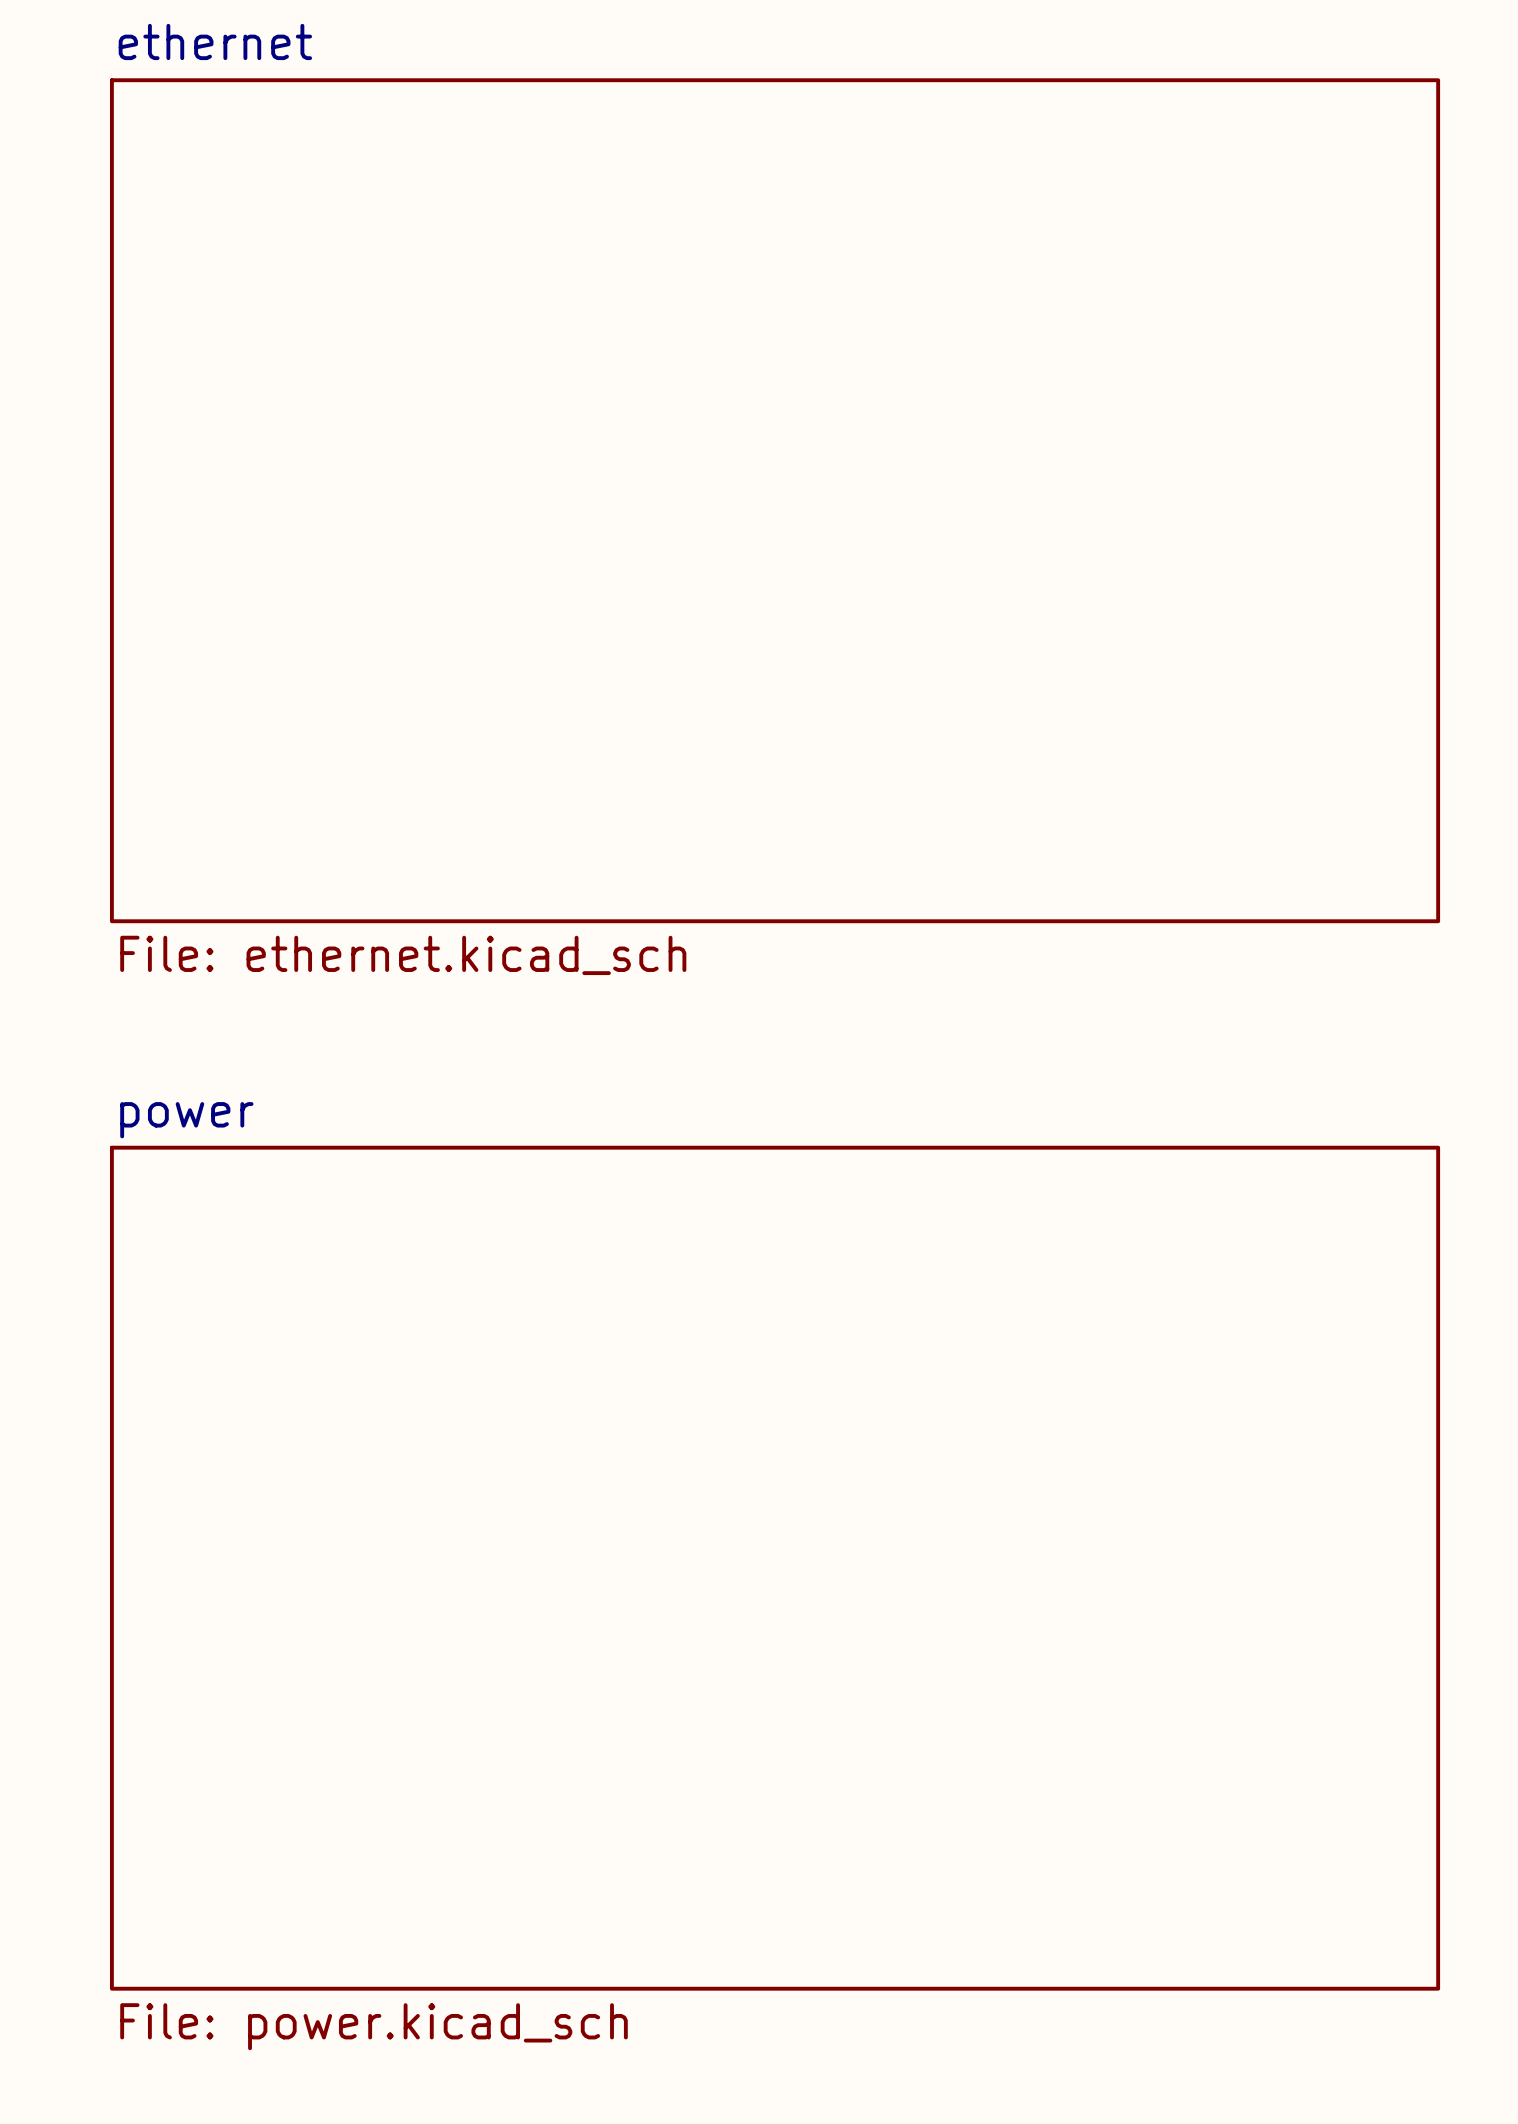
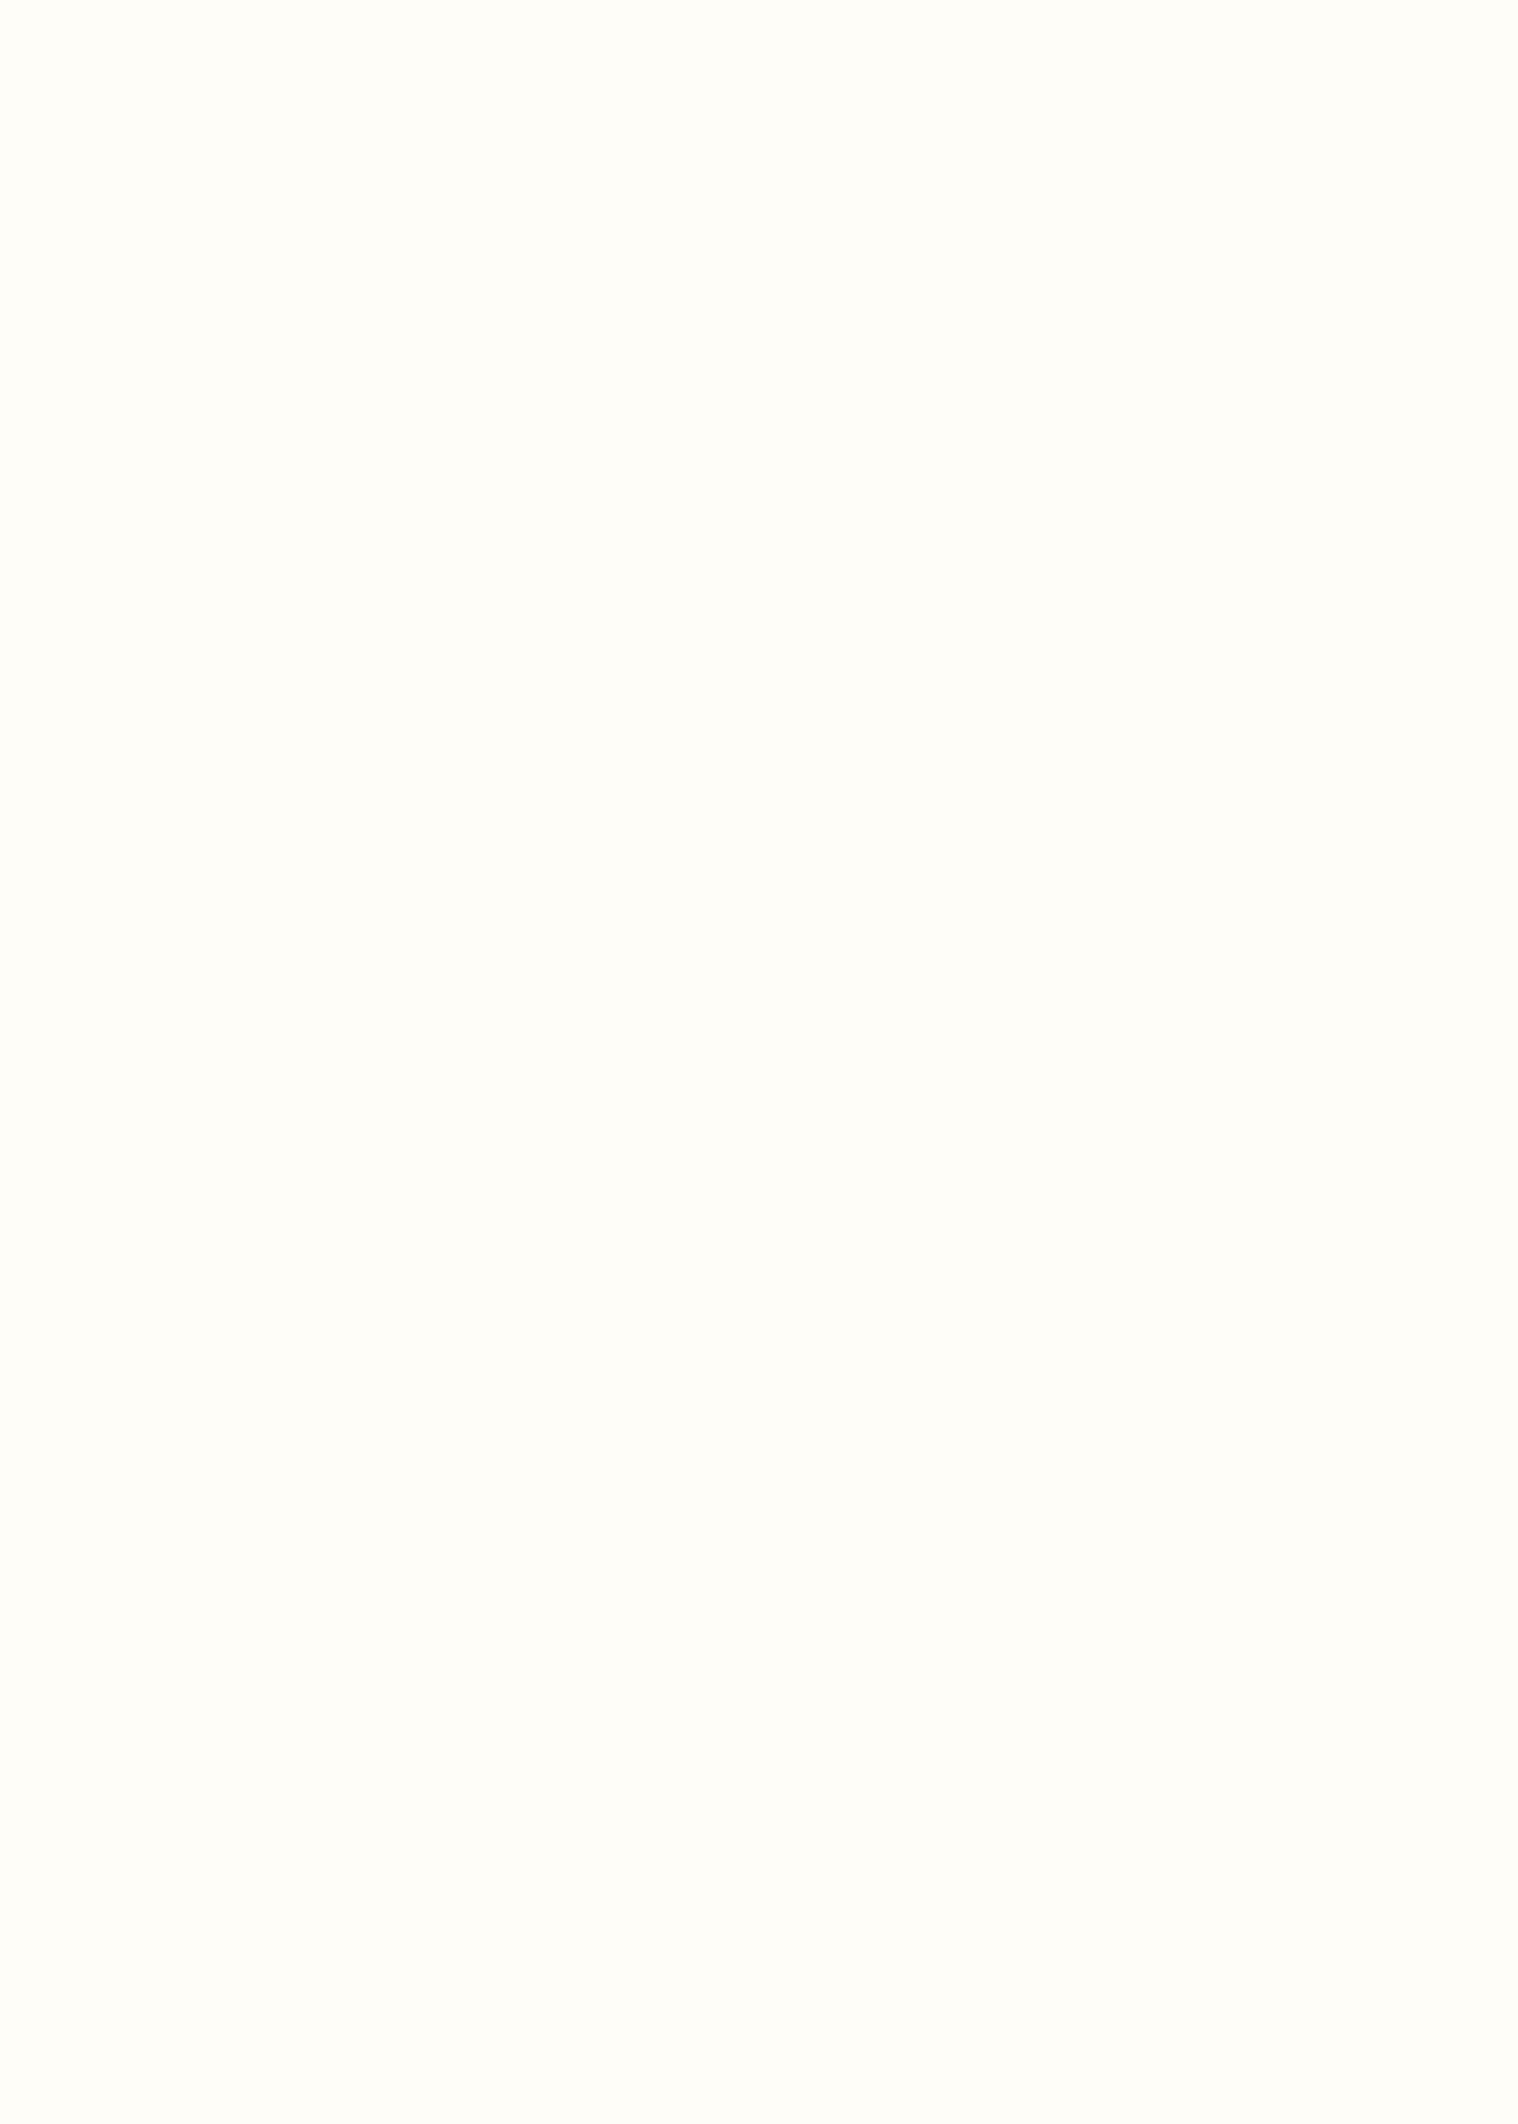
sheet ethernet: File: ethernet.kicad_sch (775, 500) -> none
sheet power: File: power.kicad_sch (775, 1568) -> none

